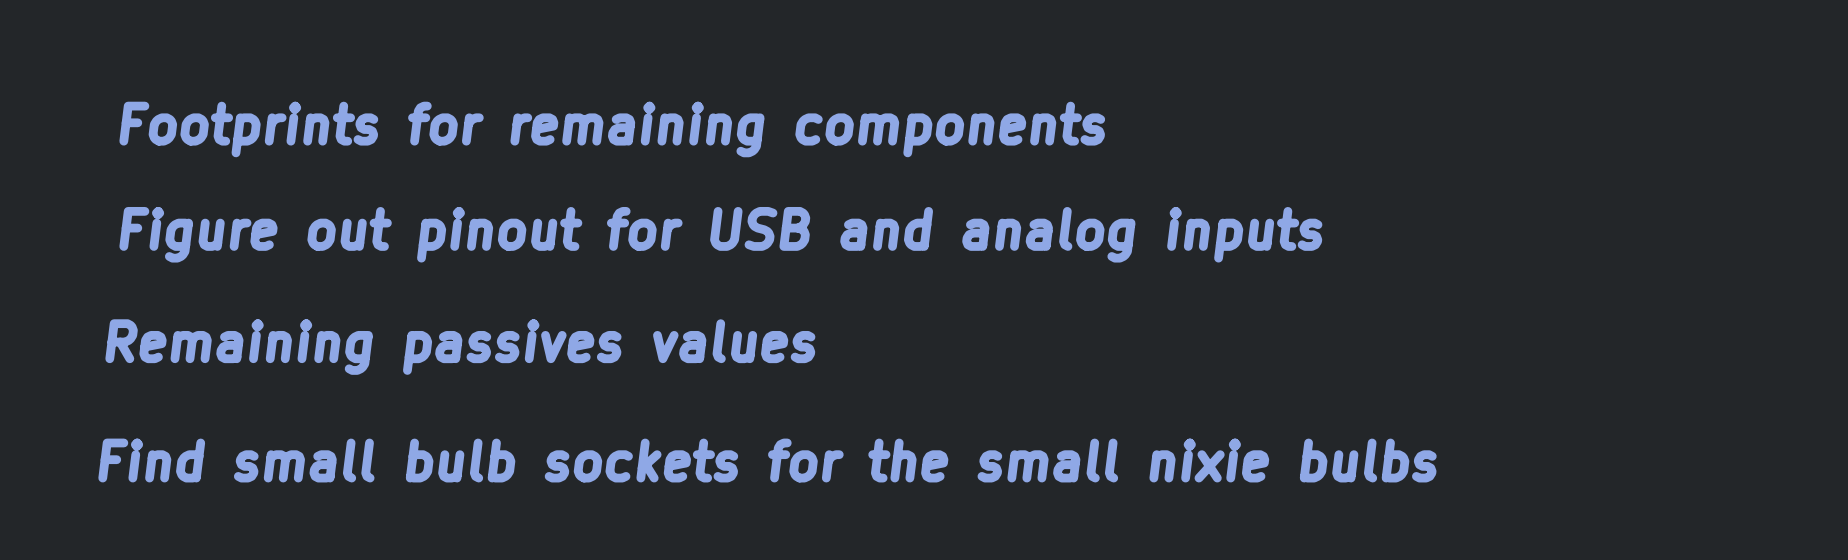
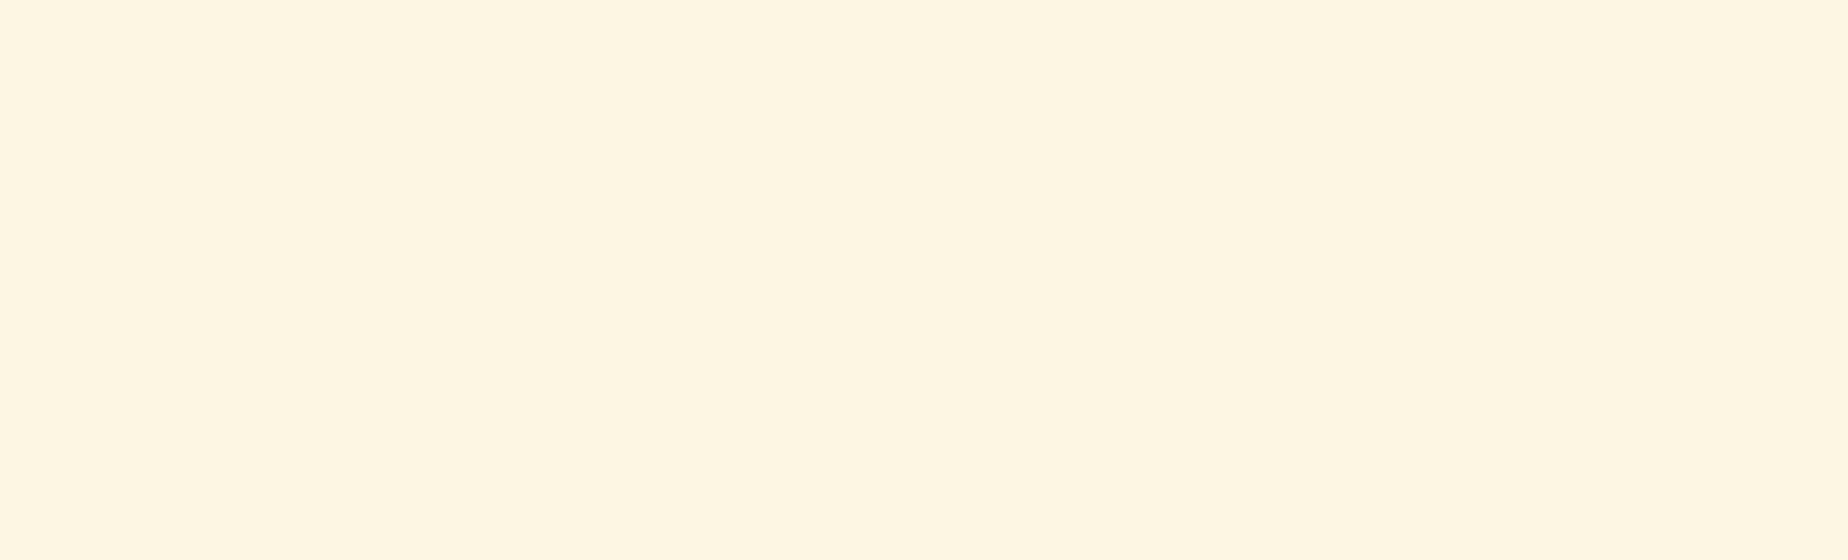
text: Footprints for remaining components (612, 129) -> none
text: Figure out pinout for USB and analog inputs (720, 234) -> none
text: Remaining passives values (460, 347) -> none
text: Find small bulb sockets for the small nixie bulbs (767, 460) -> none

